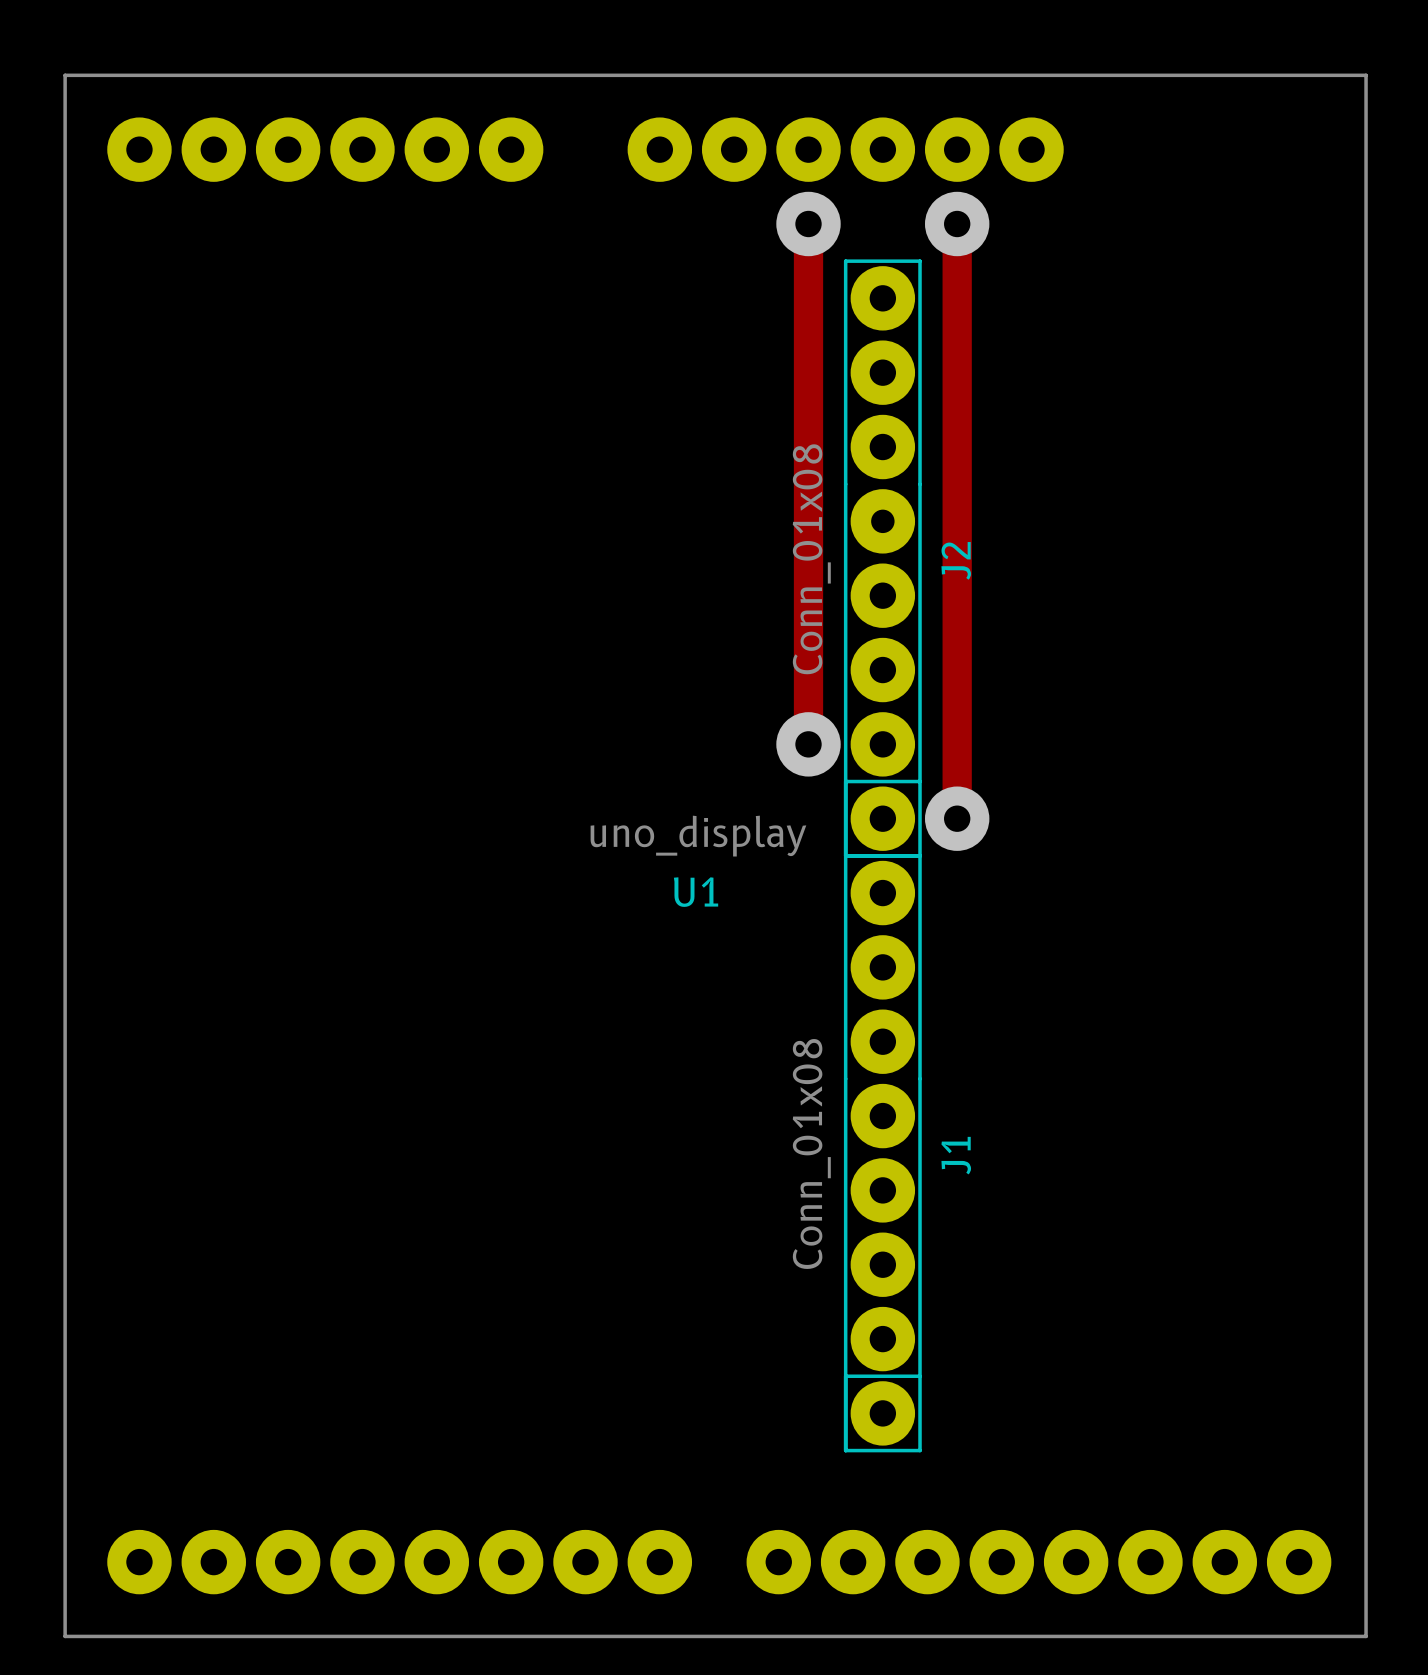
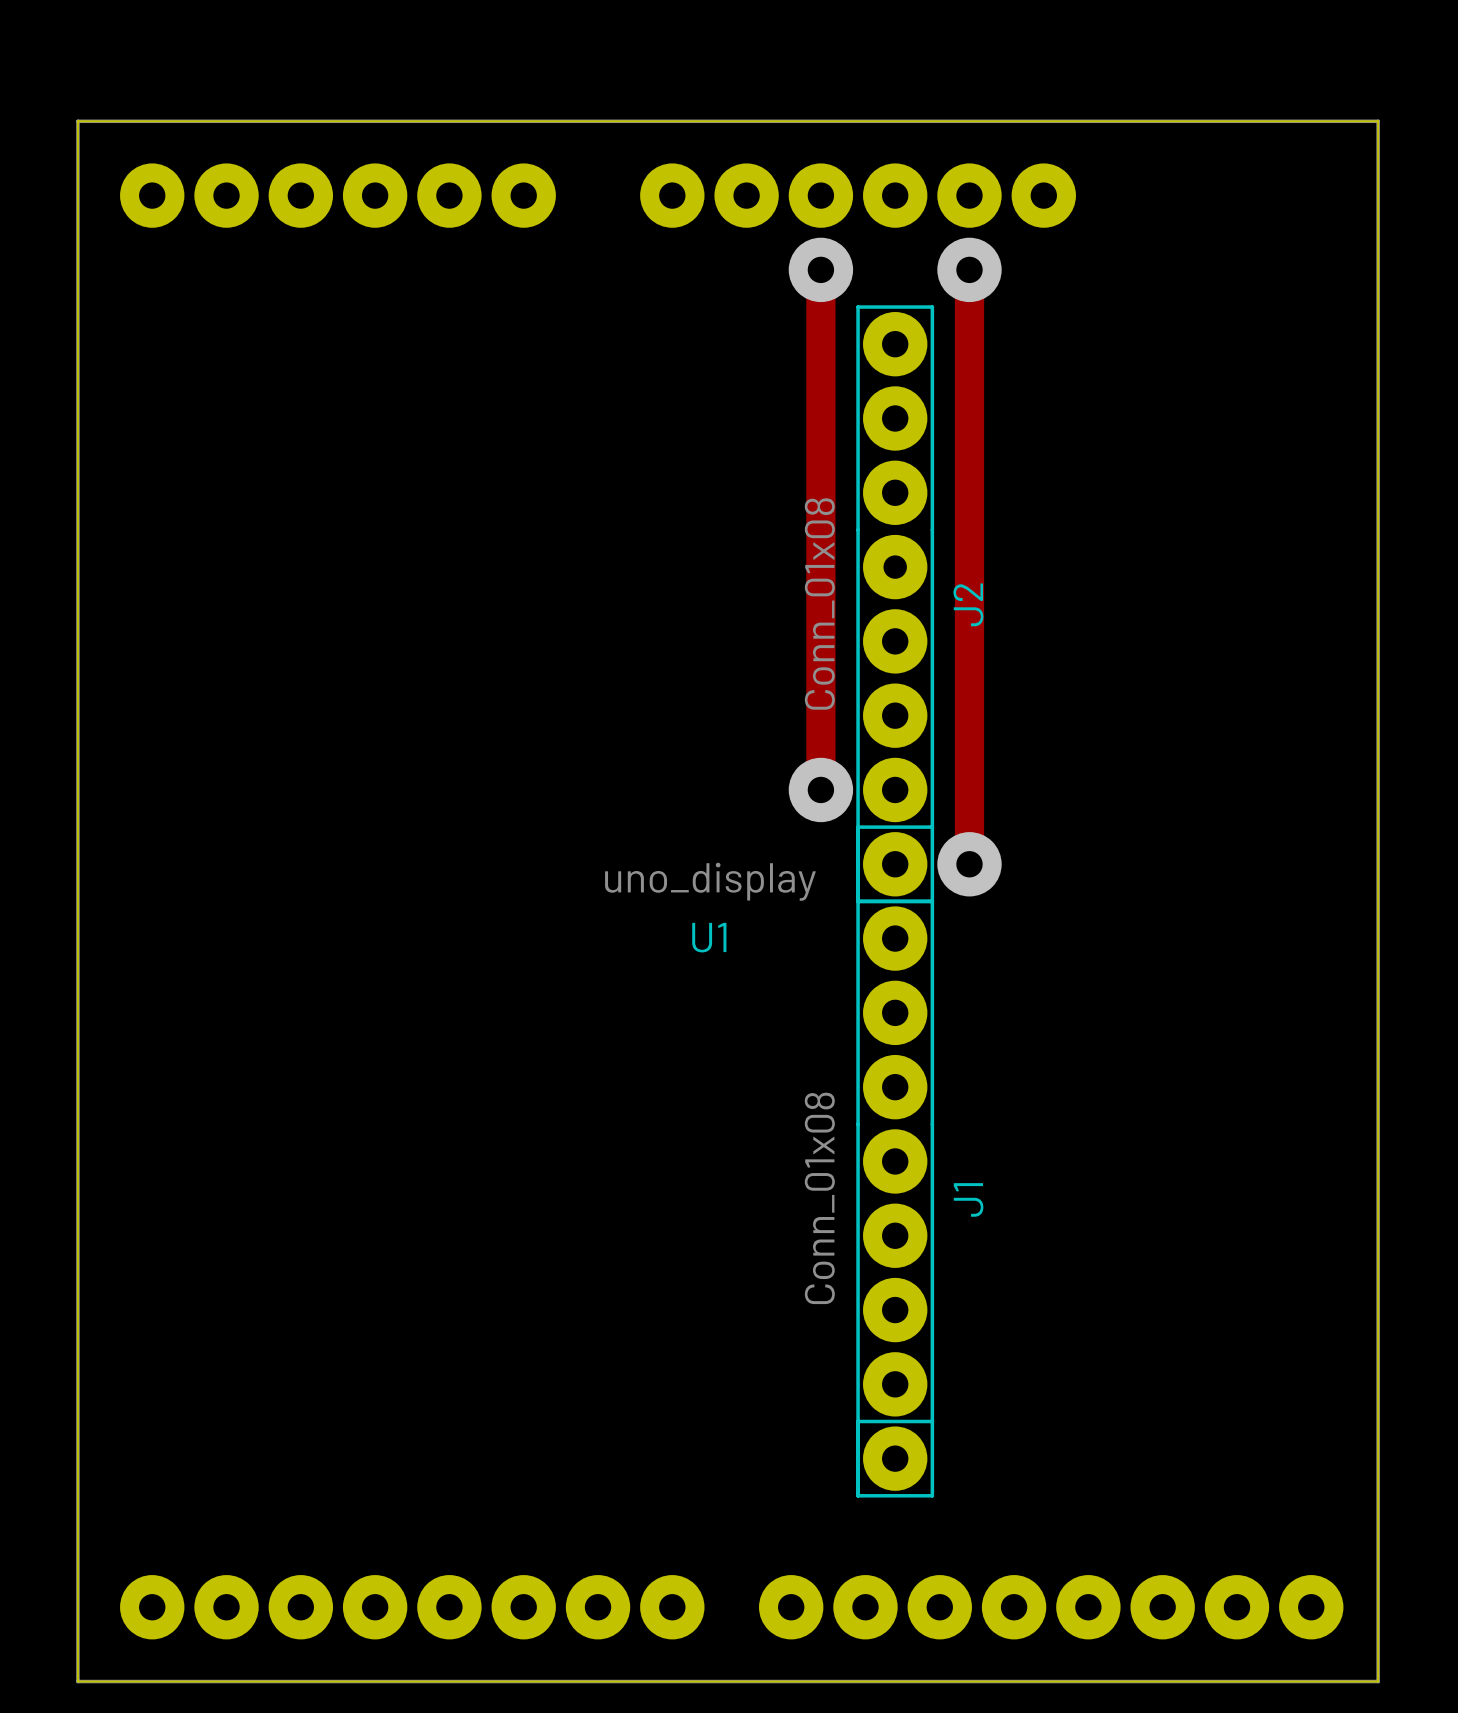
board edge: none -> (77, 121) (1378, 121) (1378, 1681) (77, 1681) (77, 121)

